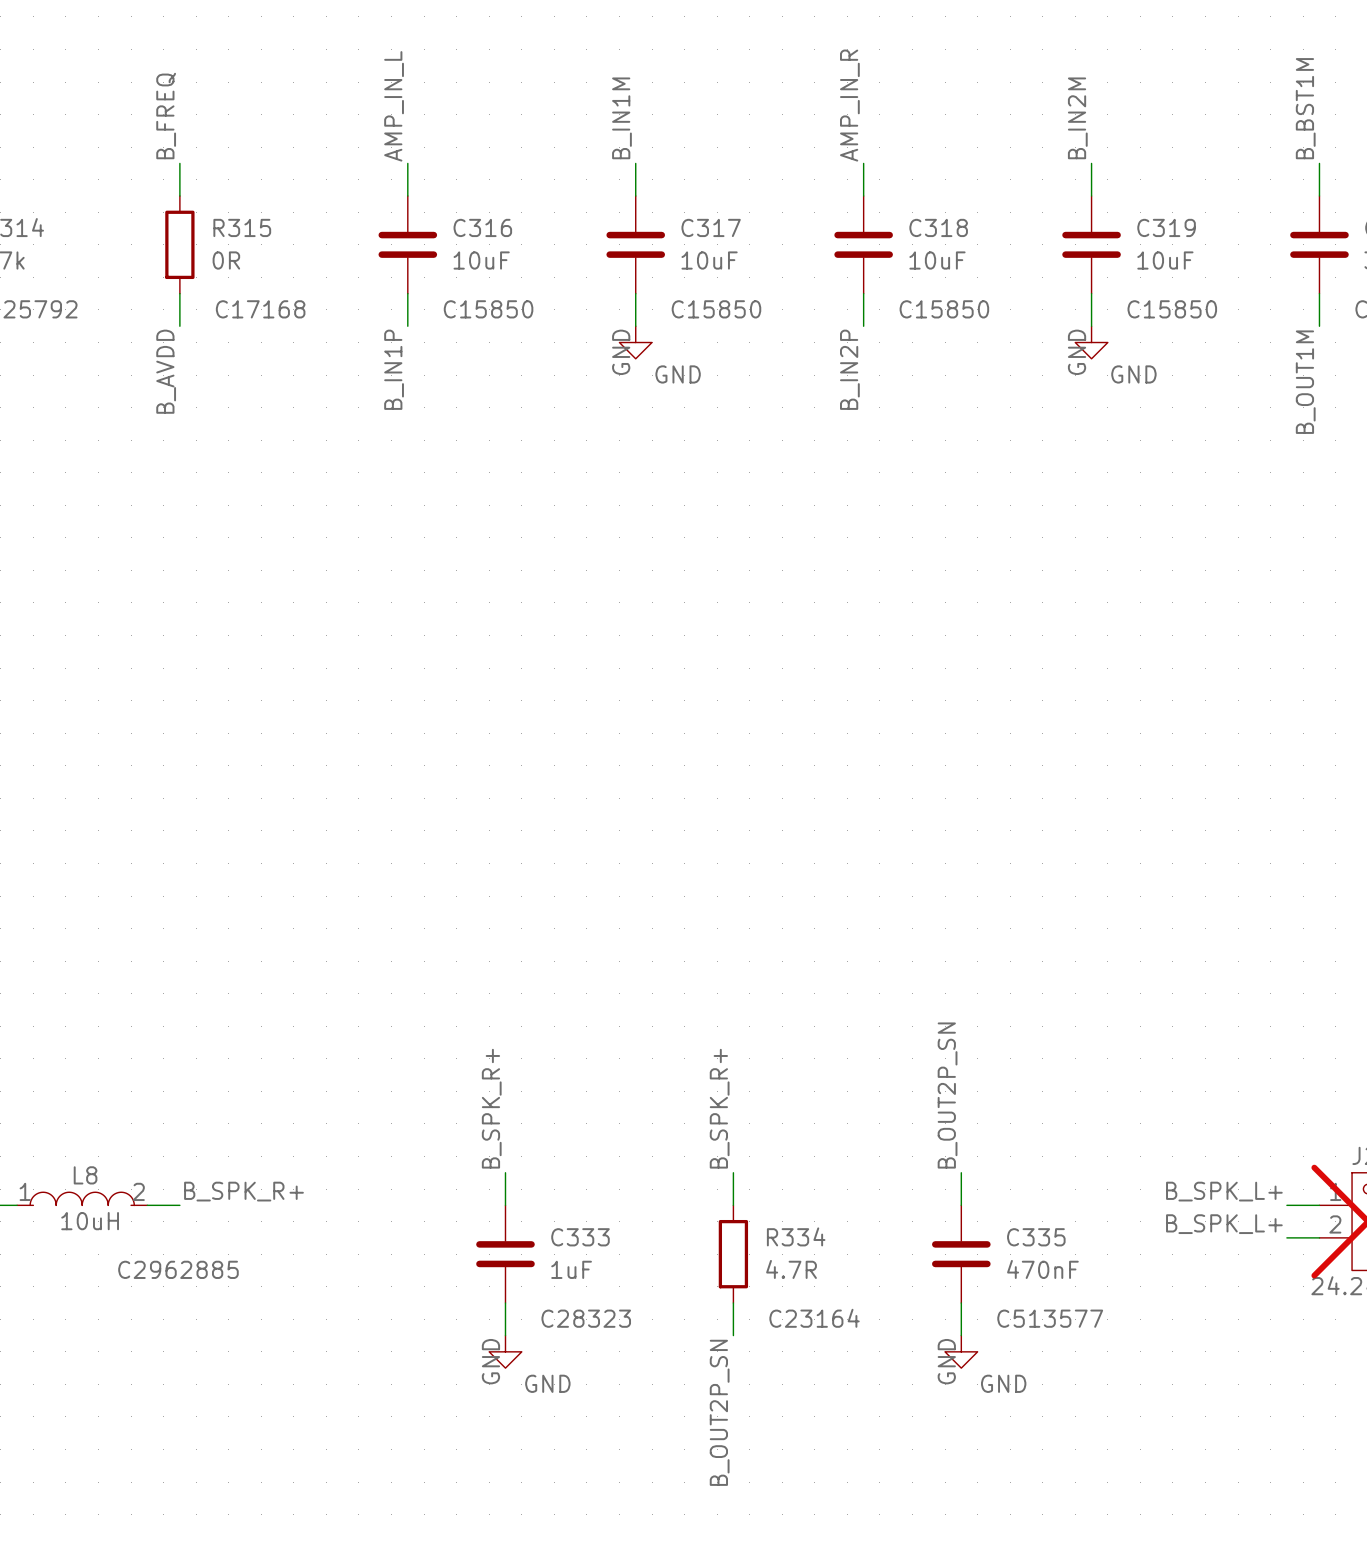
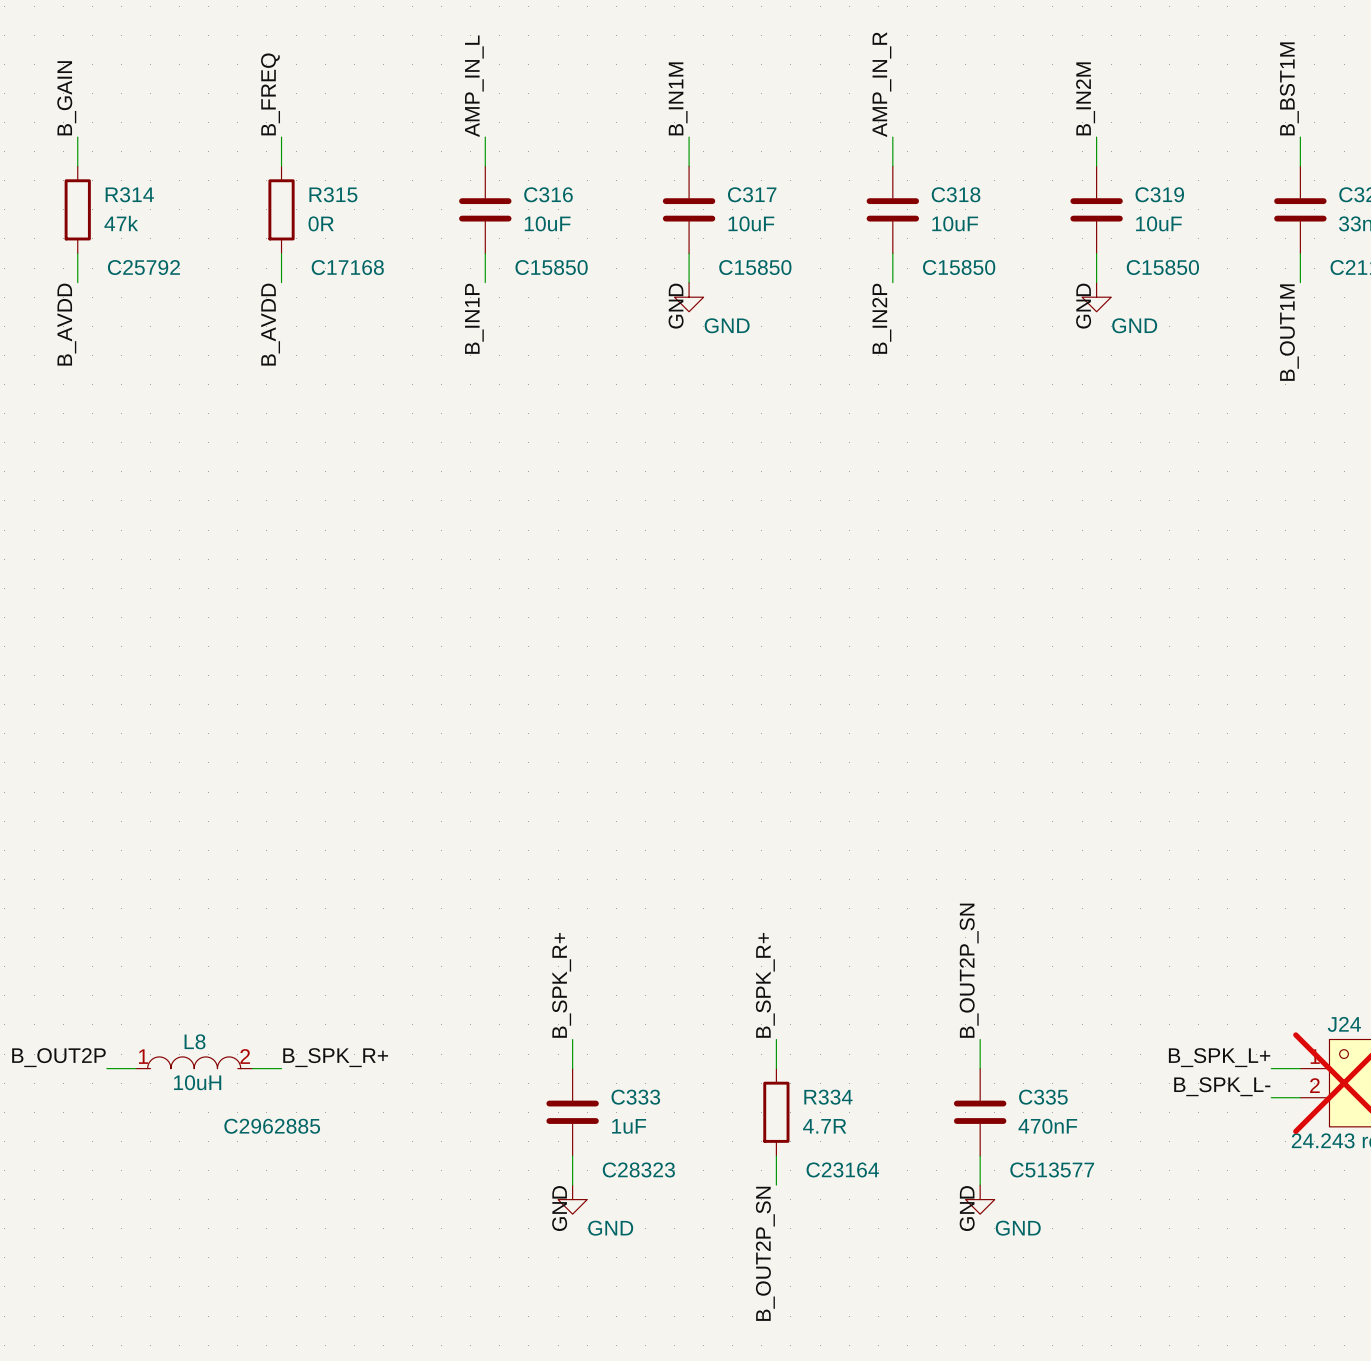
label: B_SPK_L+ (1224, 1224) -> B_SPK_L- (1222, 1086)

